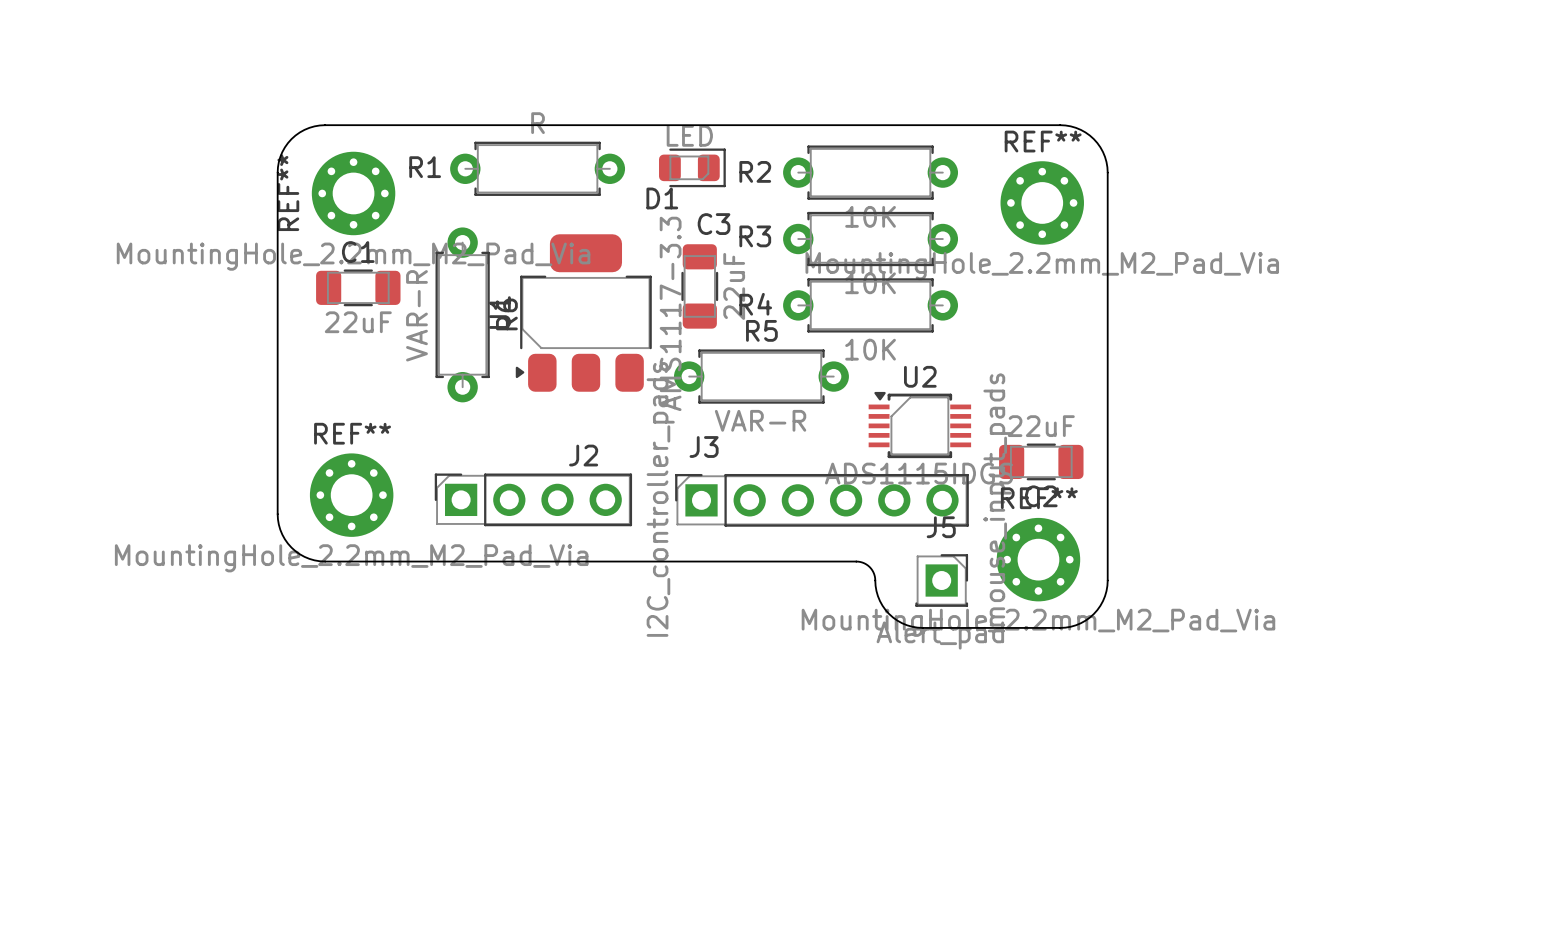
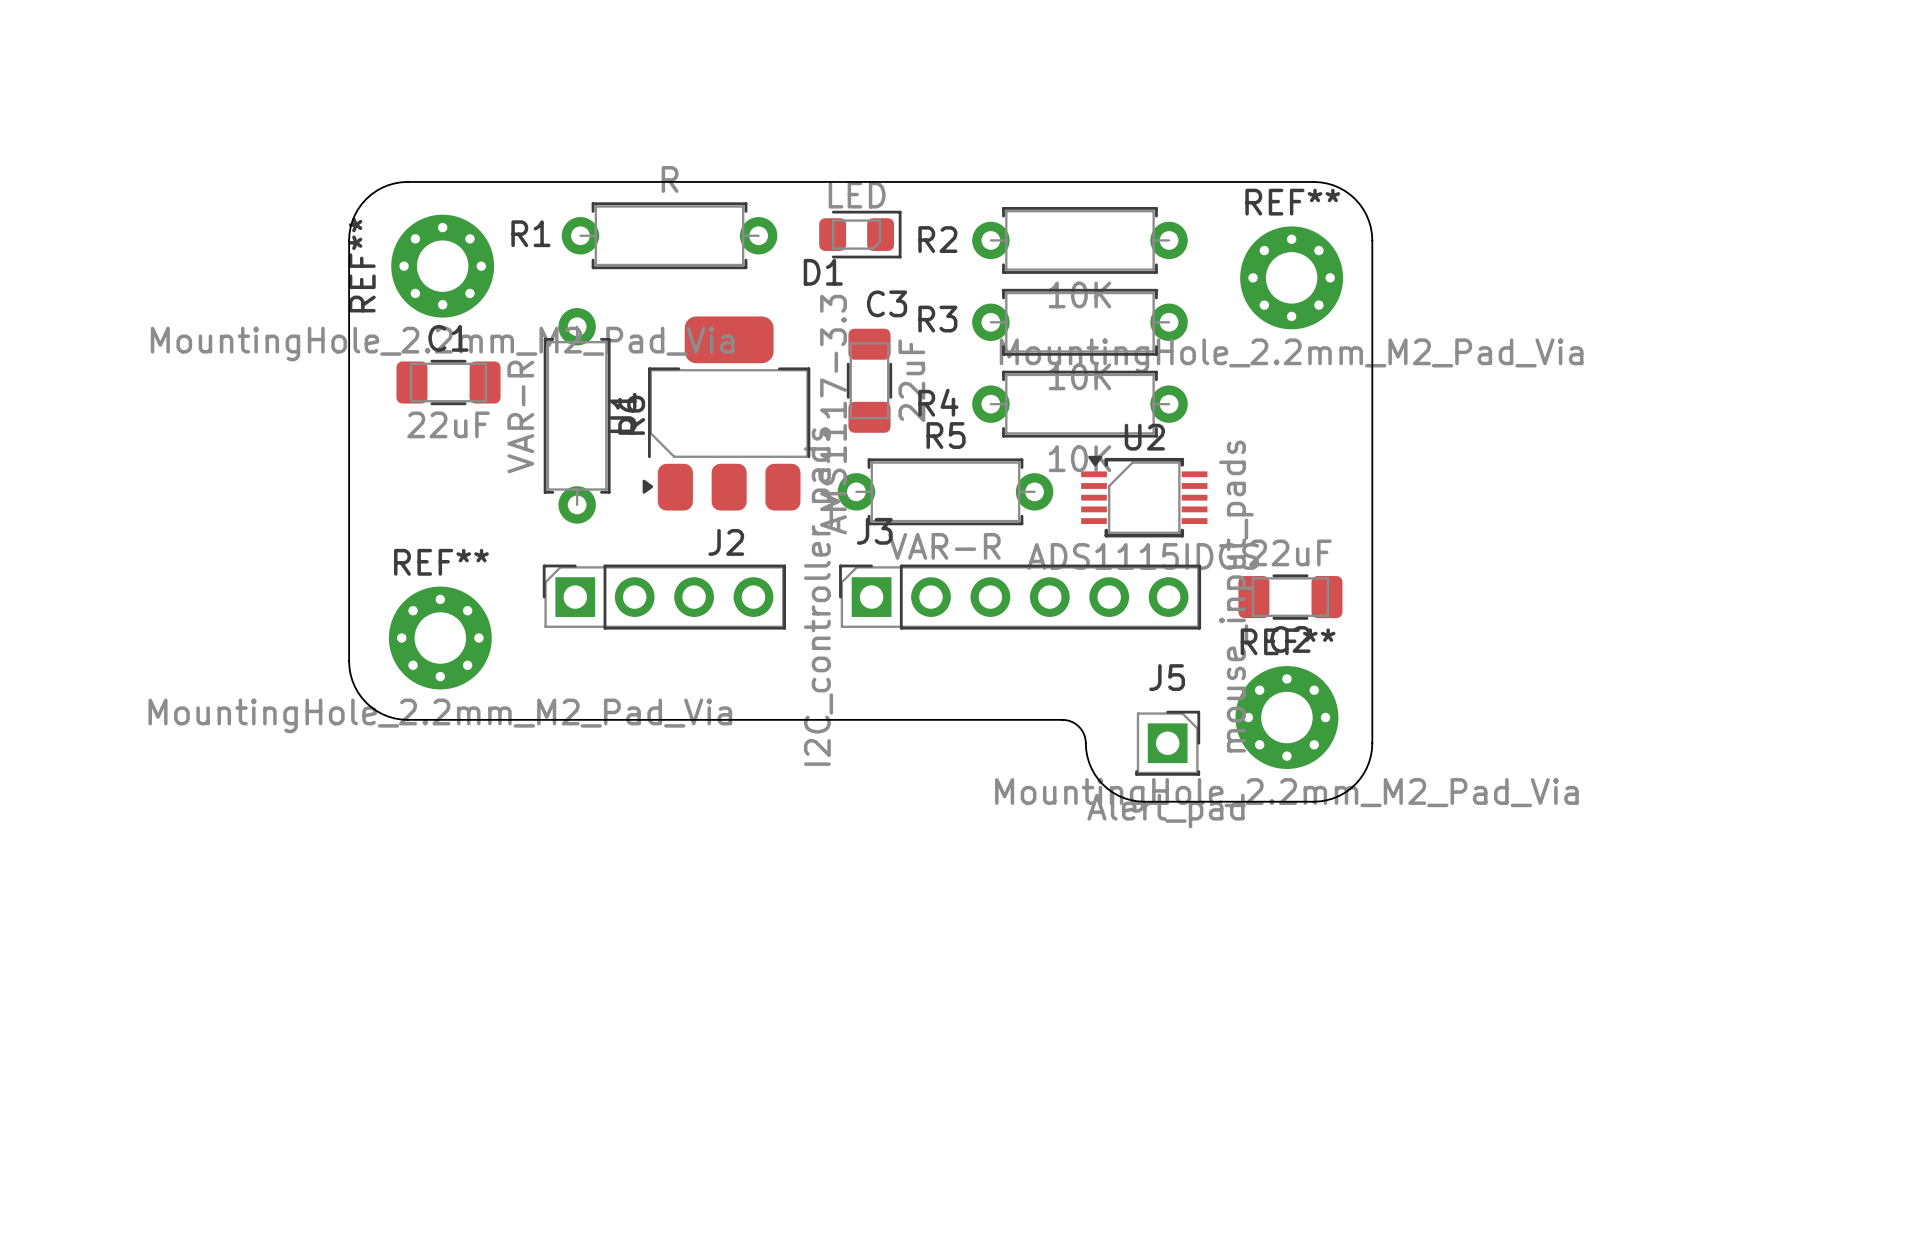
U2 position: (919, 425) -> (1144, 496)
J2 position: (533, 499) -> (664, 597)
J3 position: (821, 500) -> (1020, 597)

